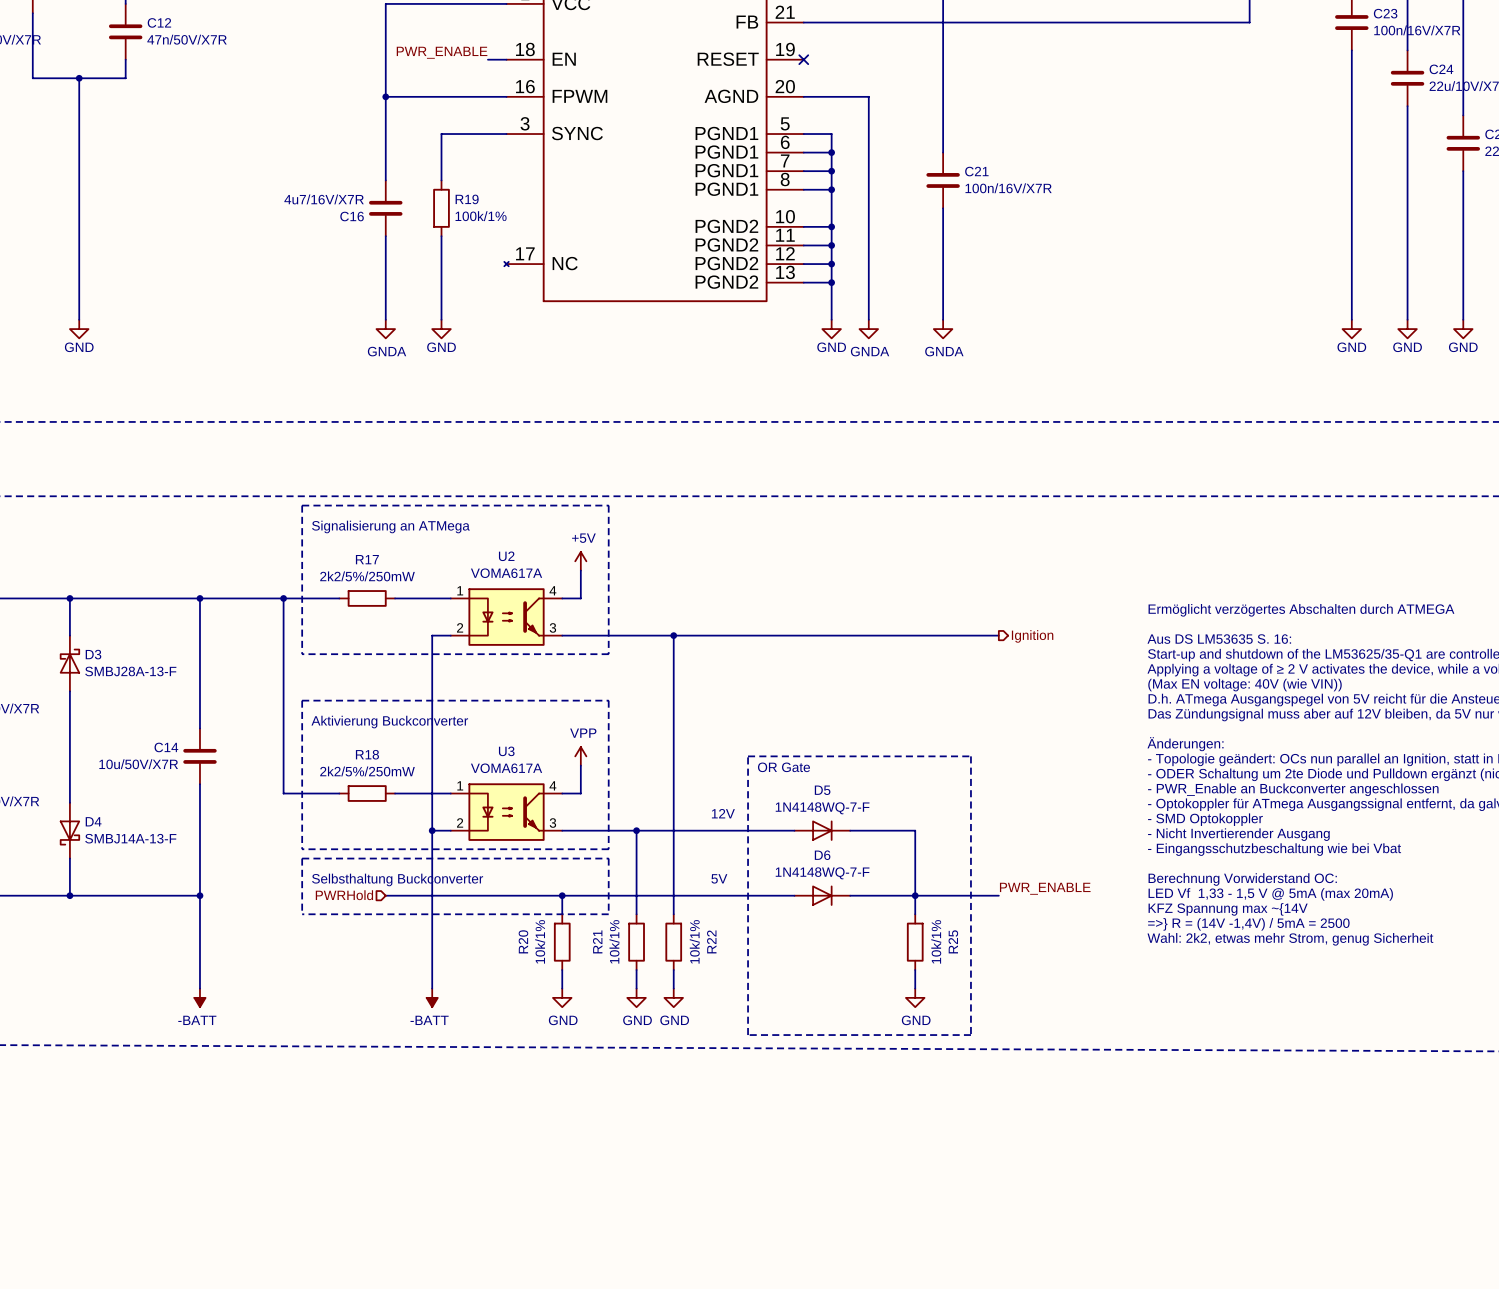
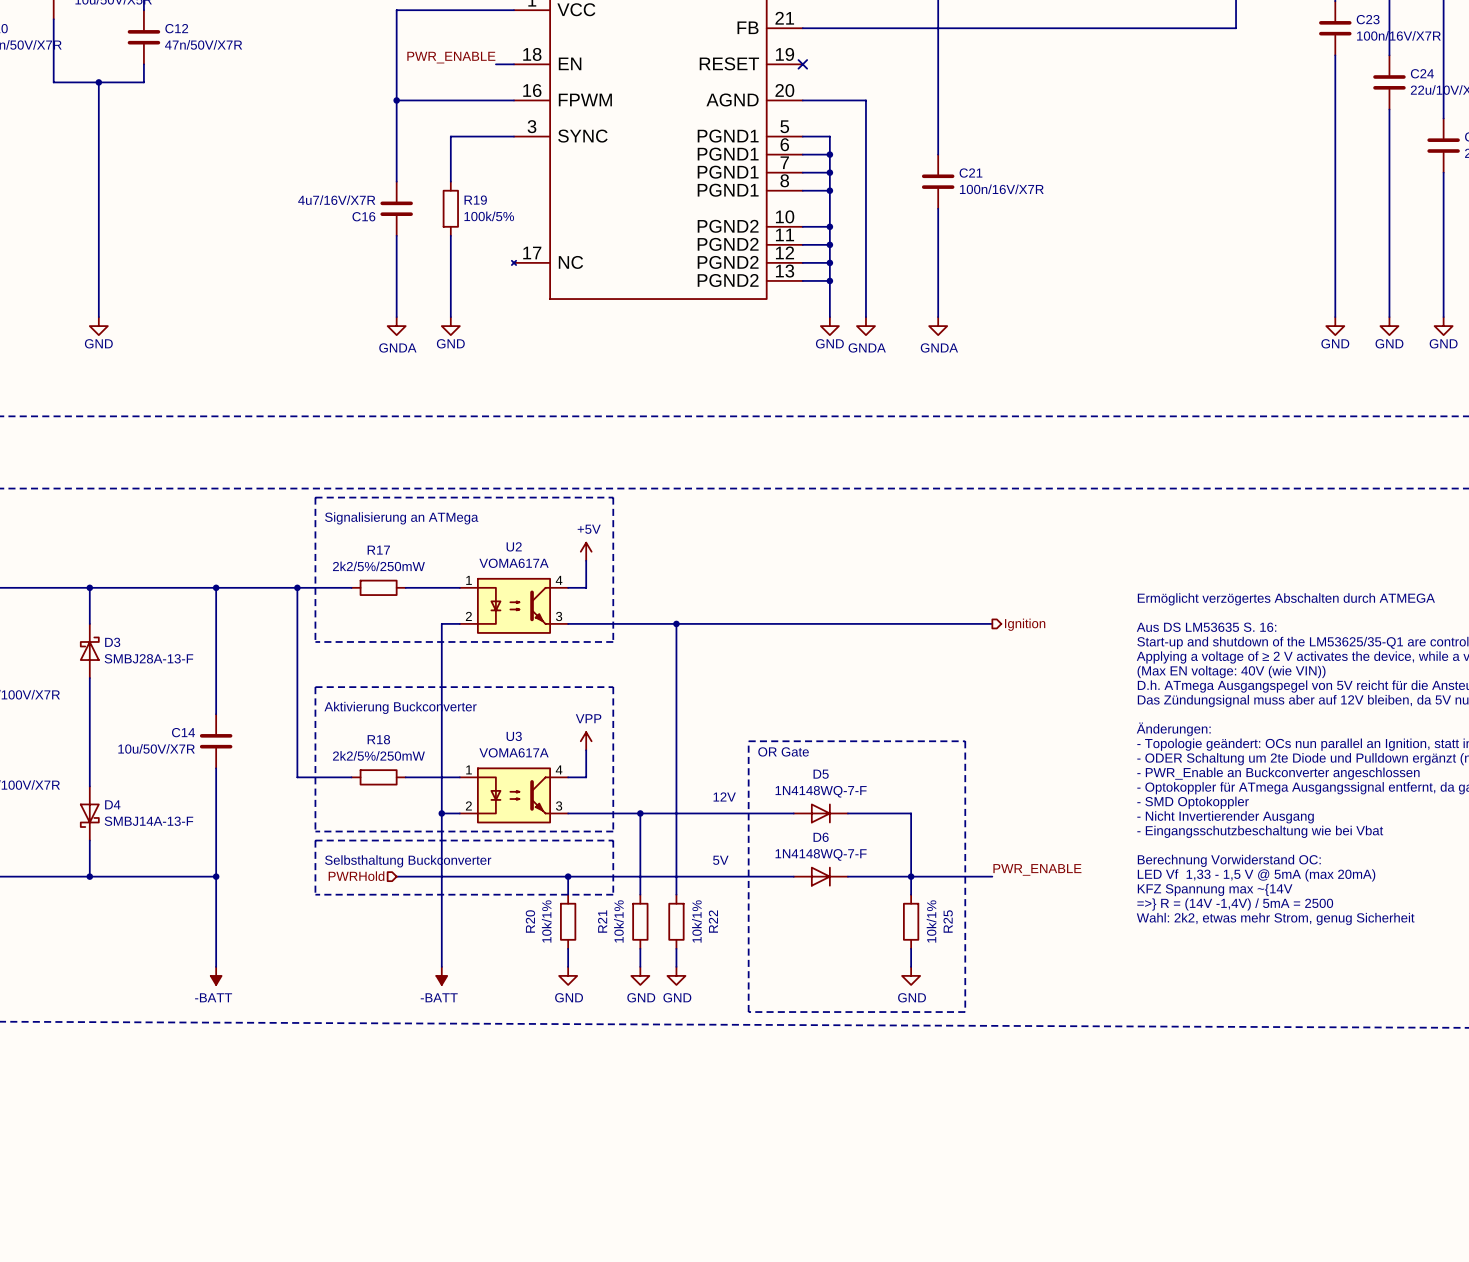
R19 value: 100k/1% (481, 216) -> 100k/5% (489, 216)

